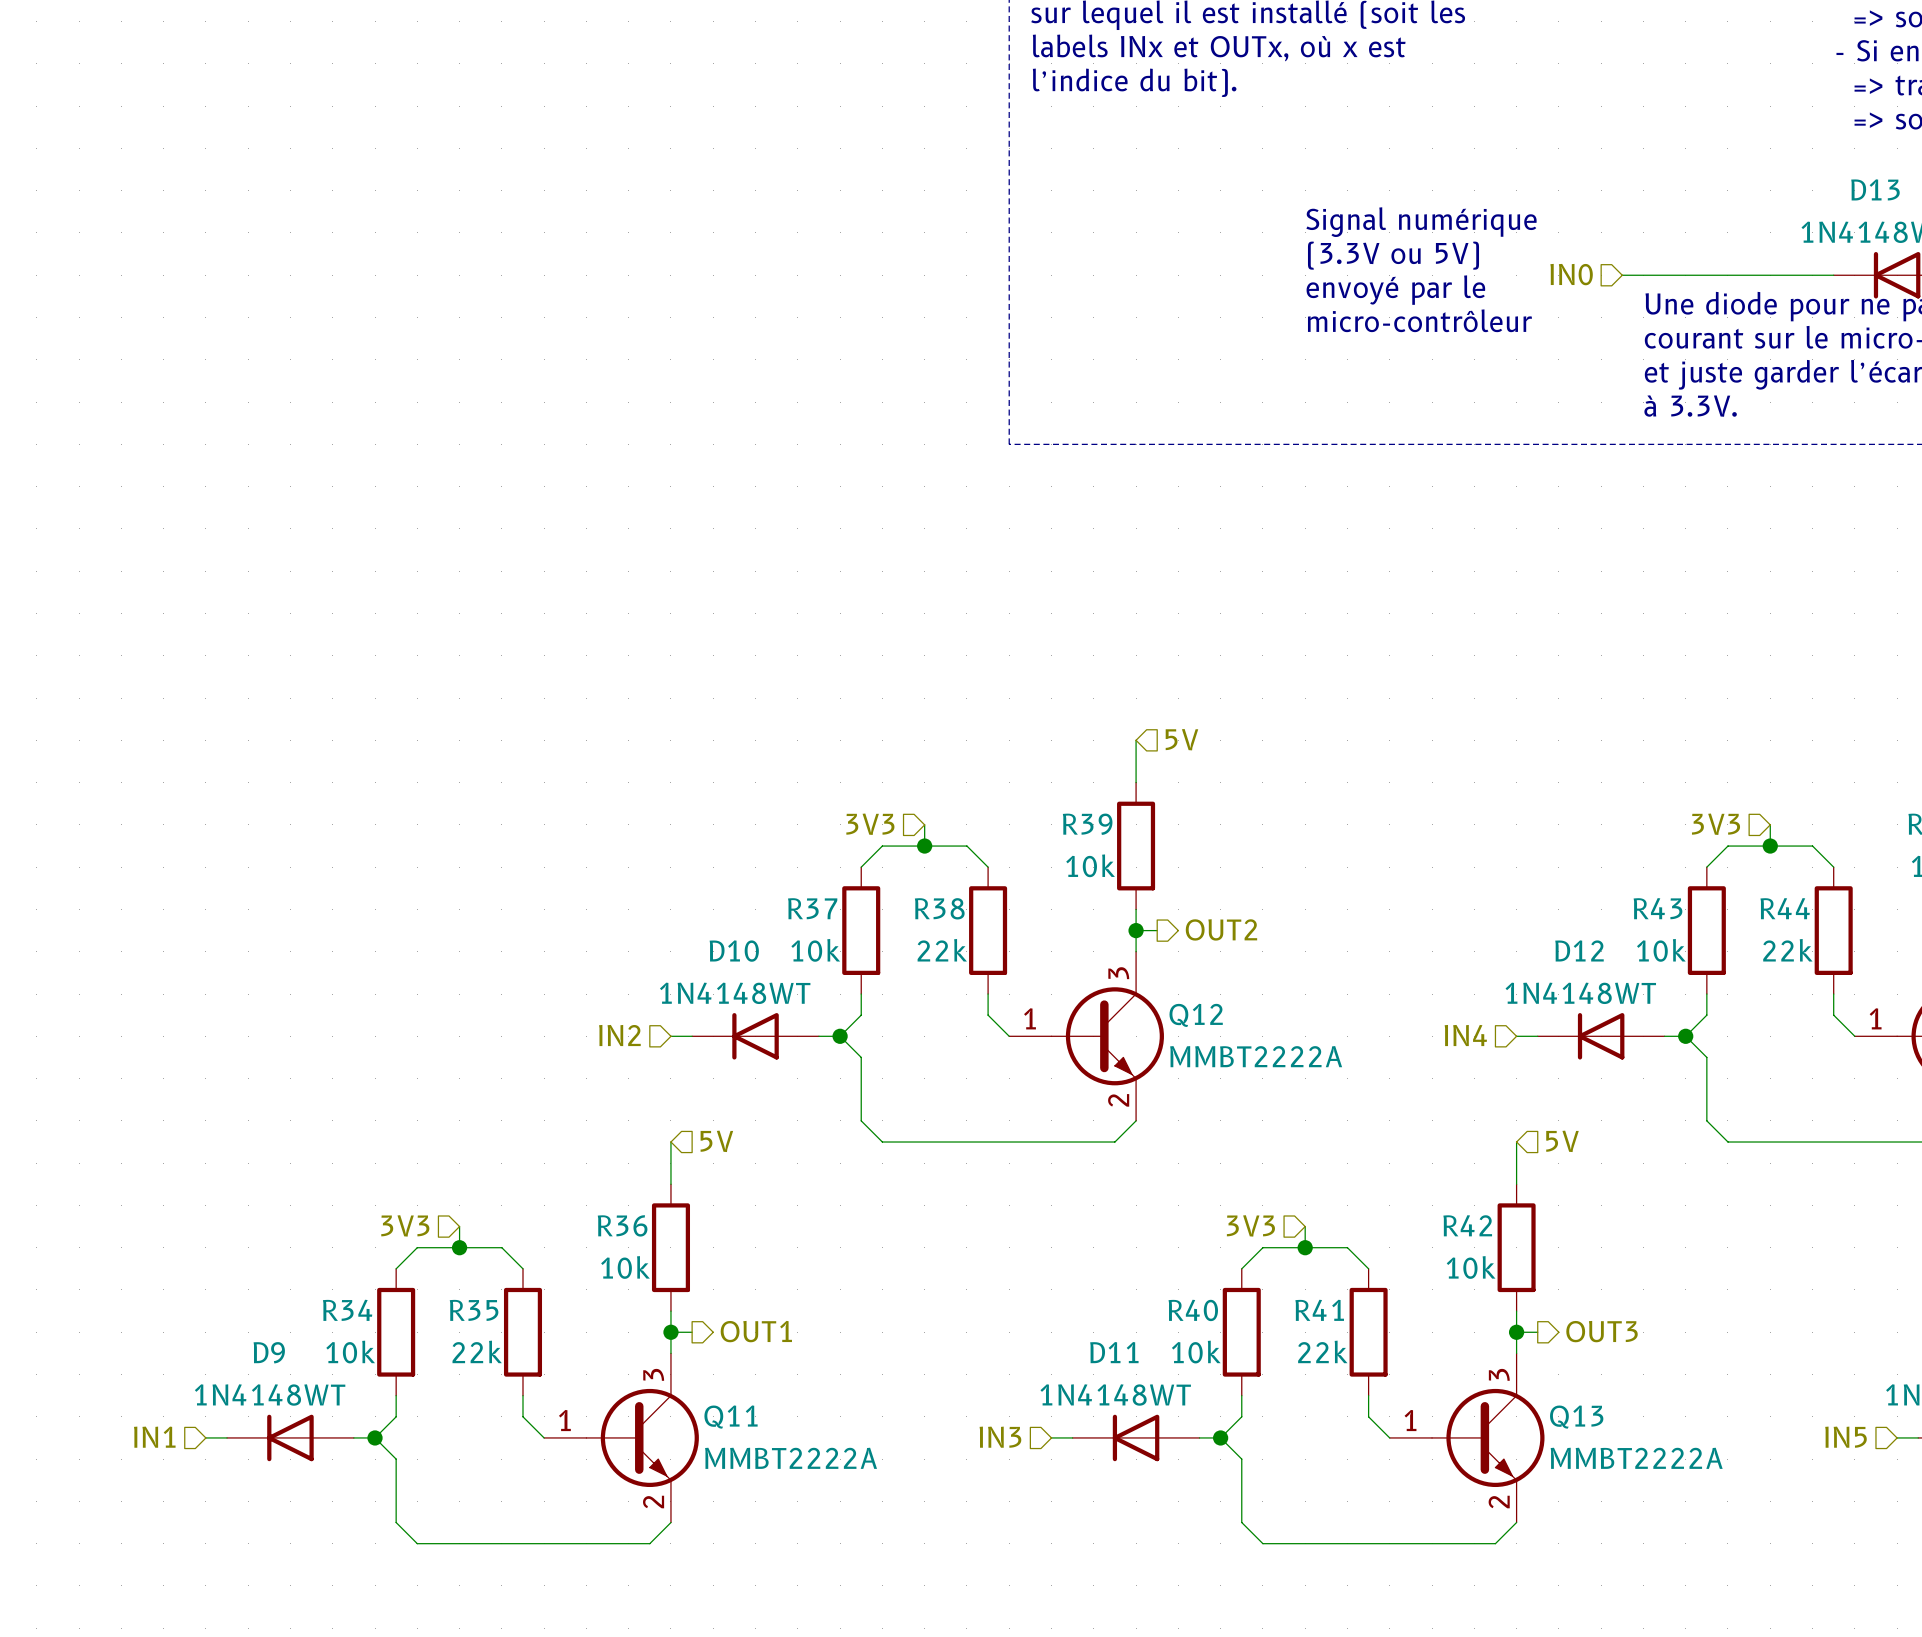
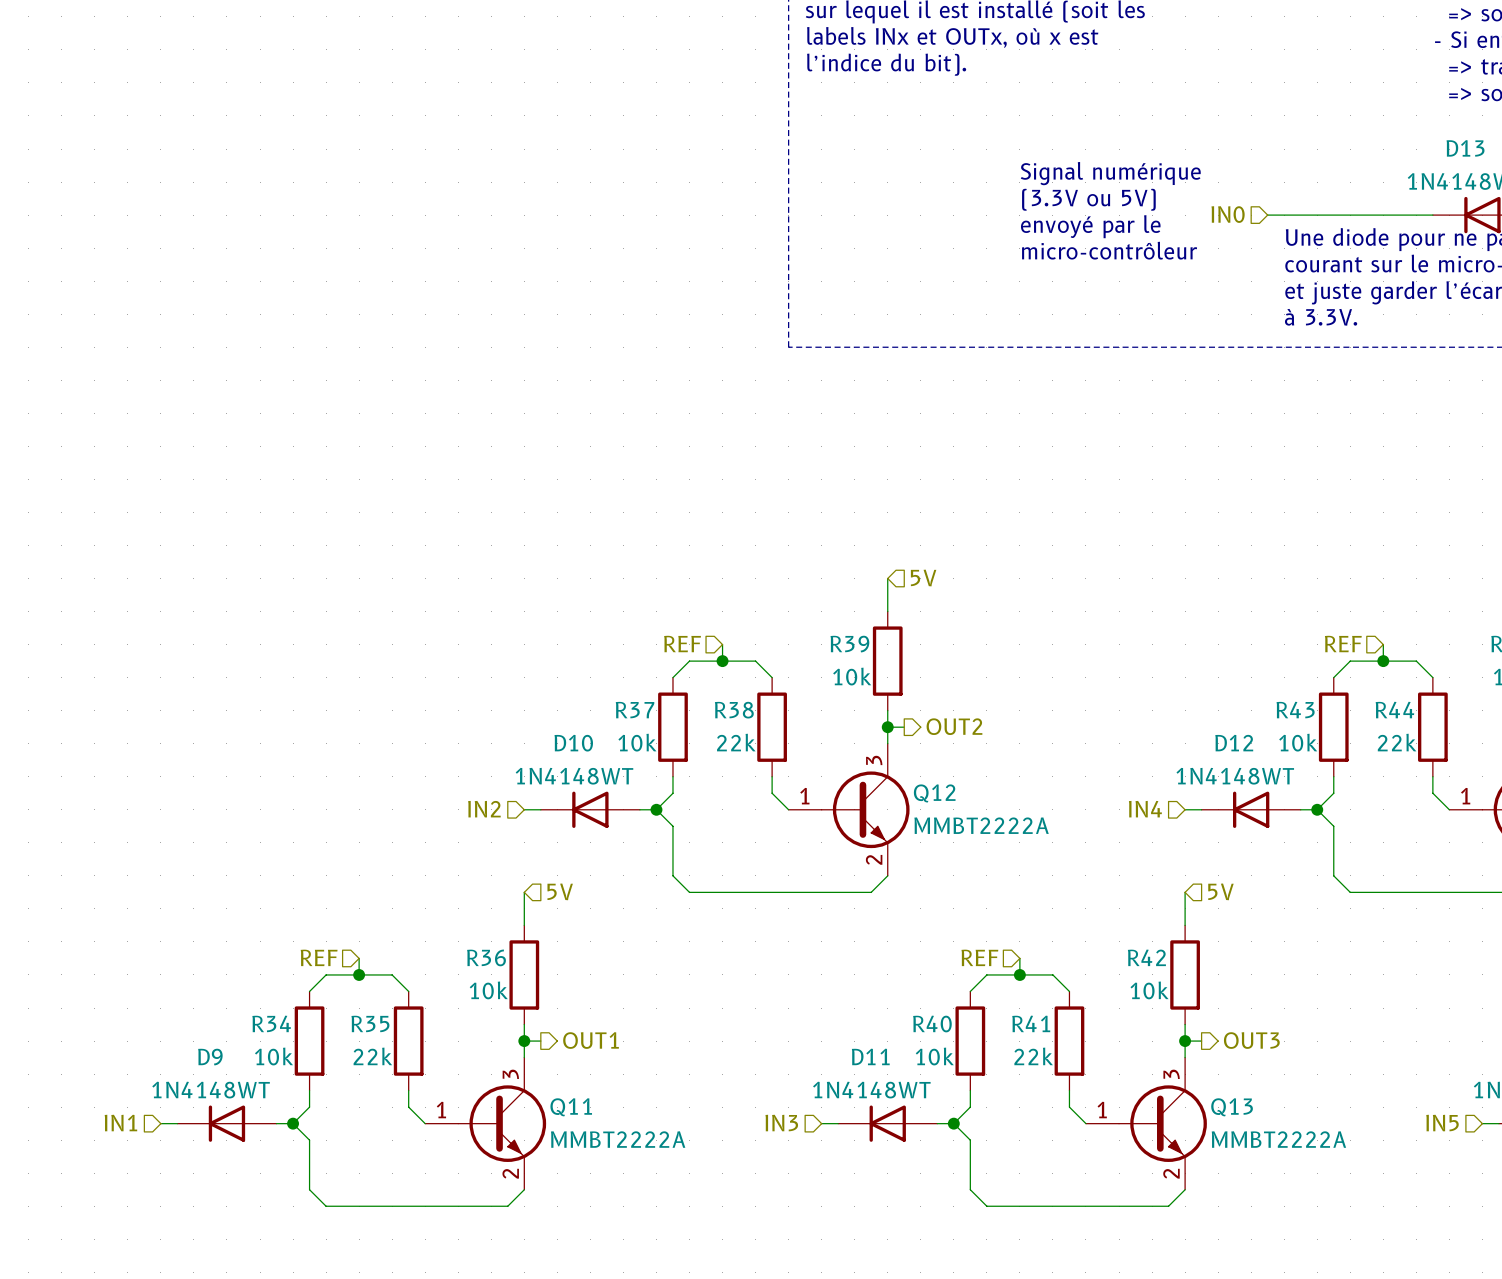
hierarchical label: 3V3 (870, 824) -> REF (682, 644)
hierarchical label: 3V3 (1716, 824) -> REF (1343, 644)
hierarchical label: 3V3 (405, 1225) -> REF (319, 957)
hierarchical label: 3V3 (1250, 1225) -> REF (979, 957)

